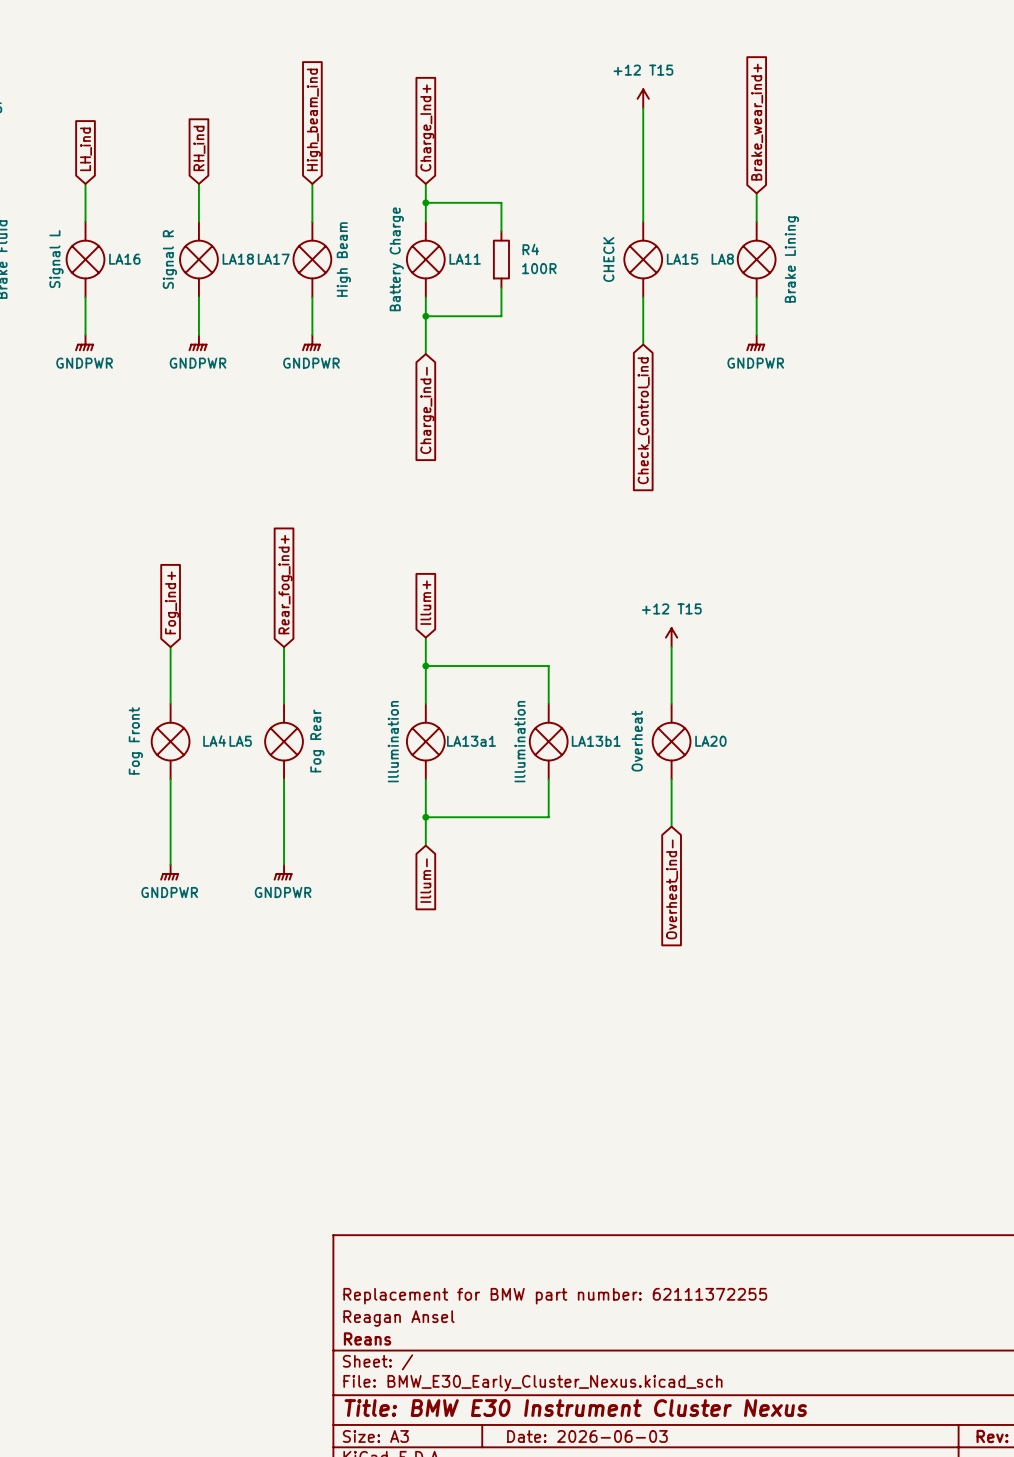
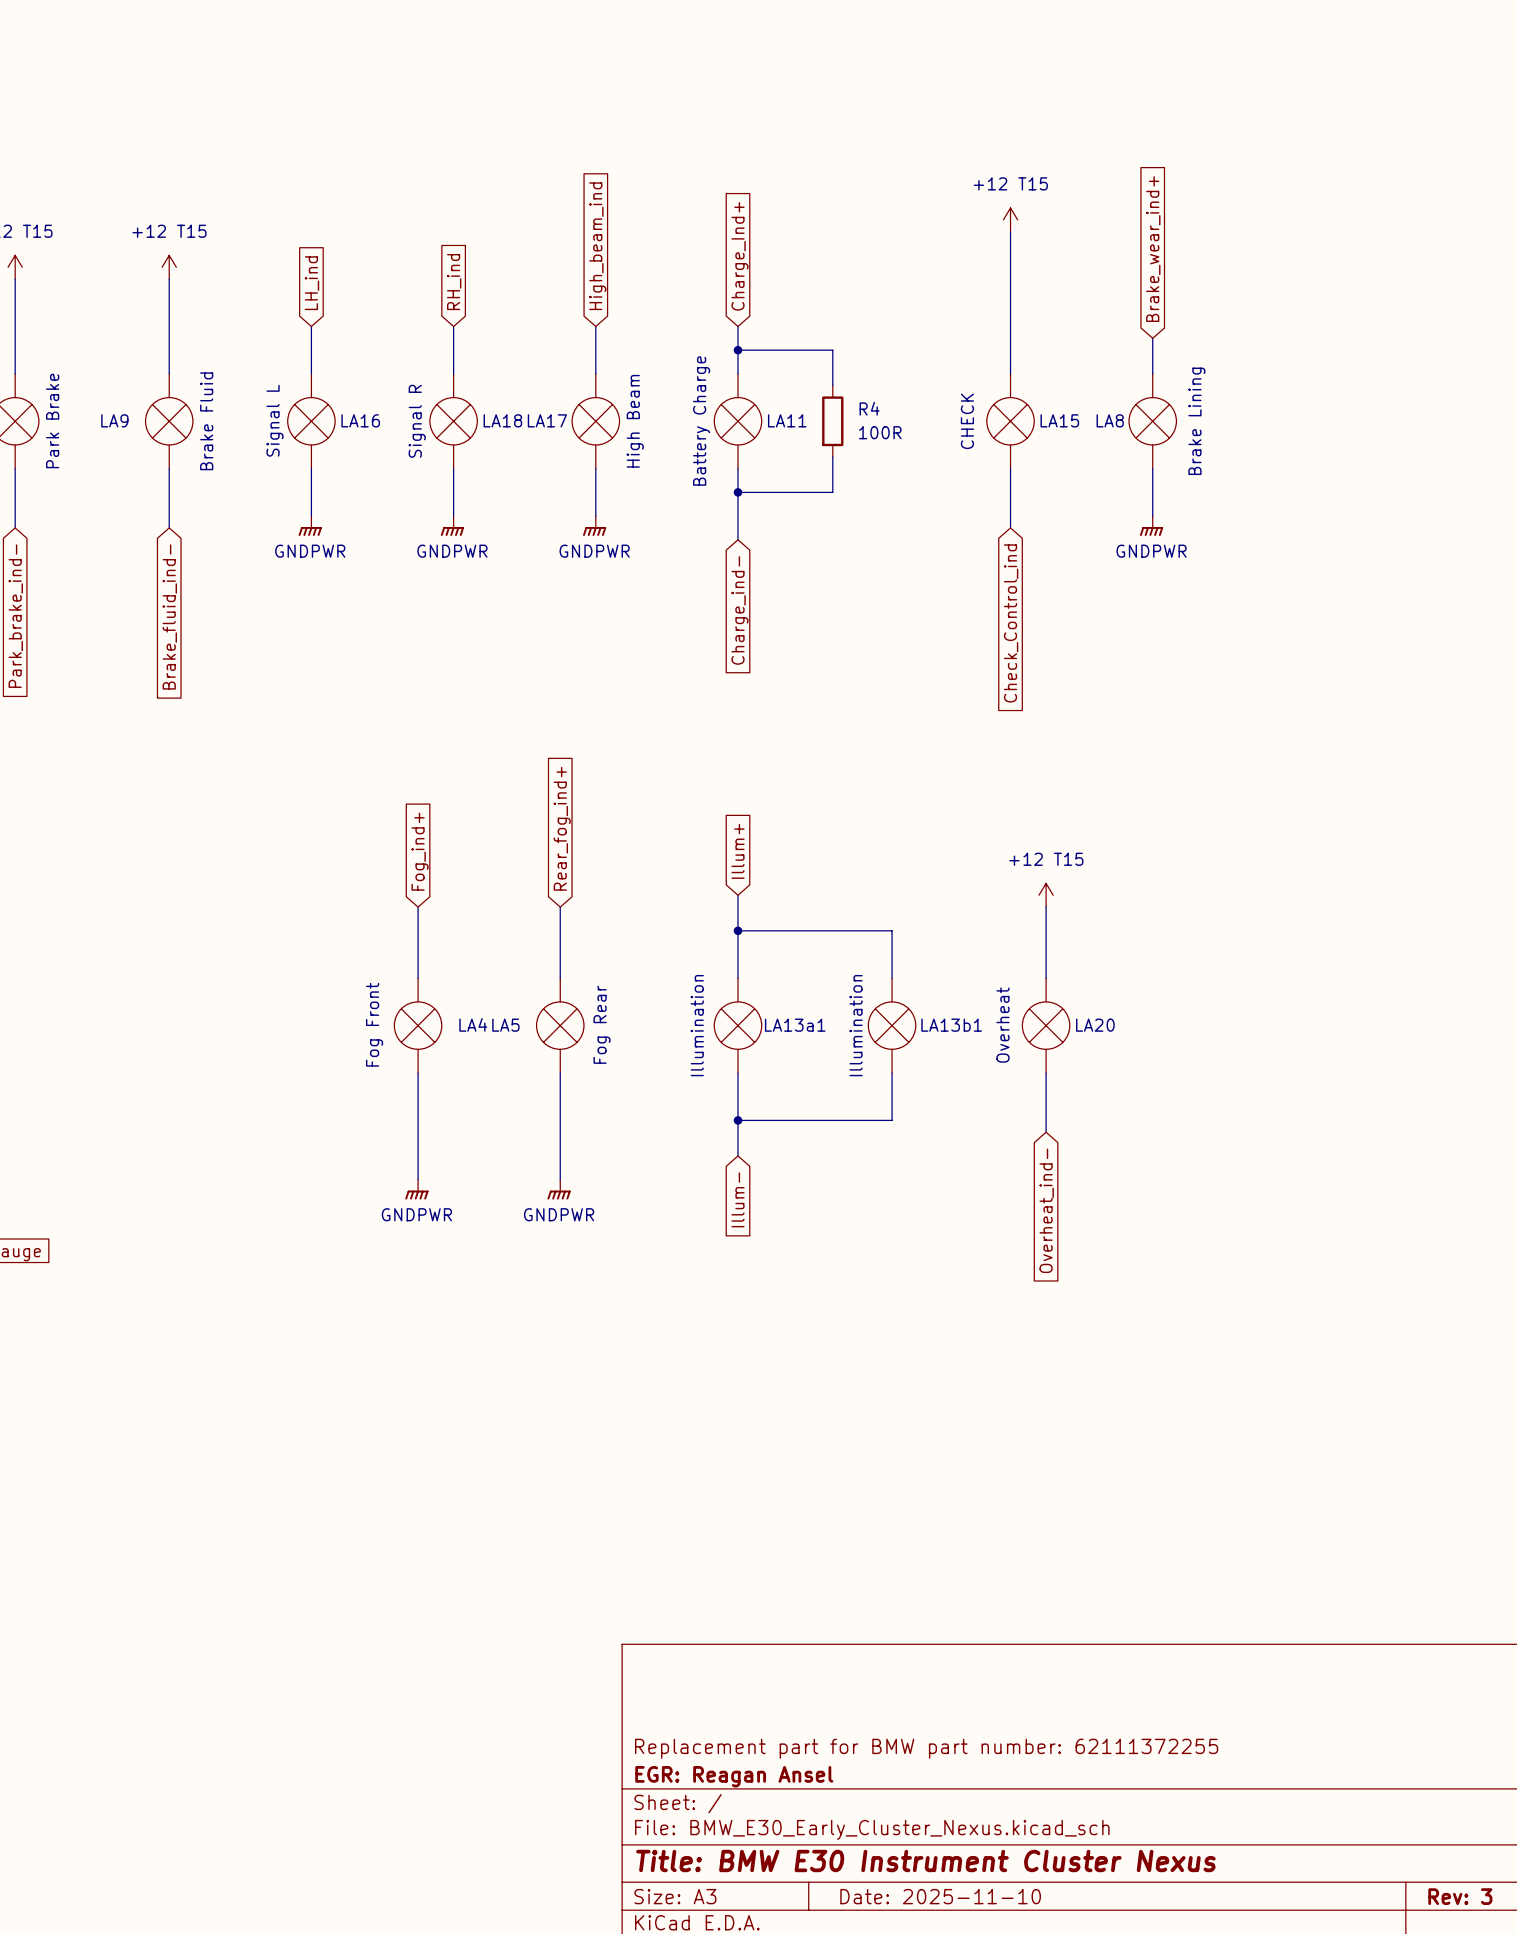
title block: Replacement for BMW part number: 62111372255 (555, 1296) -> none
title block: Reagan Ansel (398, 1318) -> Replacement part for BMW part number: 62111372255 (926, 1748)
title block: Reans (367, 1338) -> EGR: Reagan Ansel (734, 1776)
title block: Date: 2026-06-03 (587, 1436) -> Date: 2025-11-10 (940, 1896)

